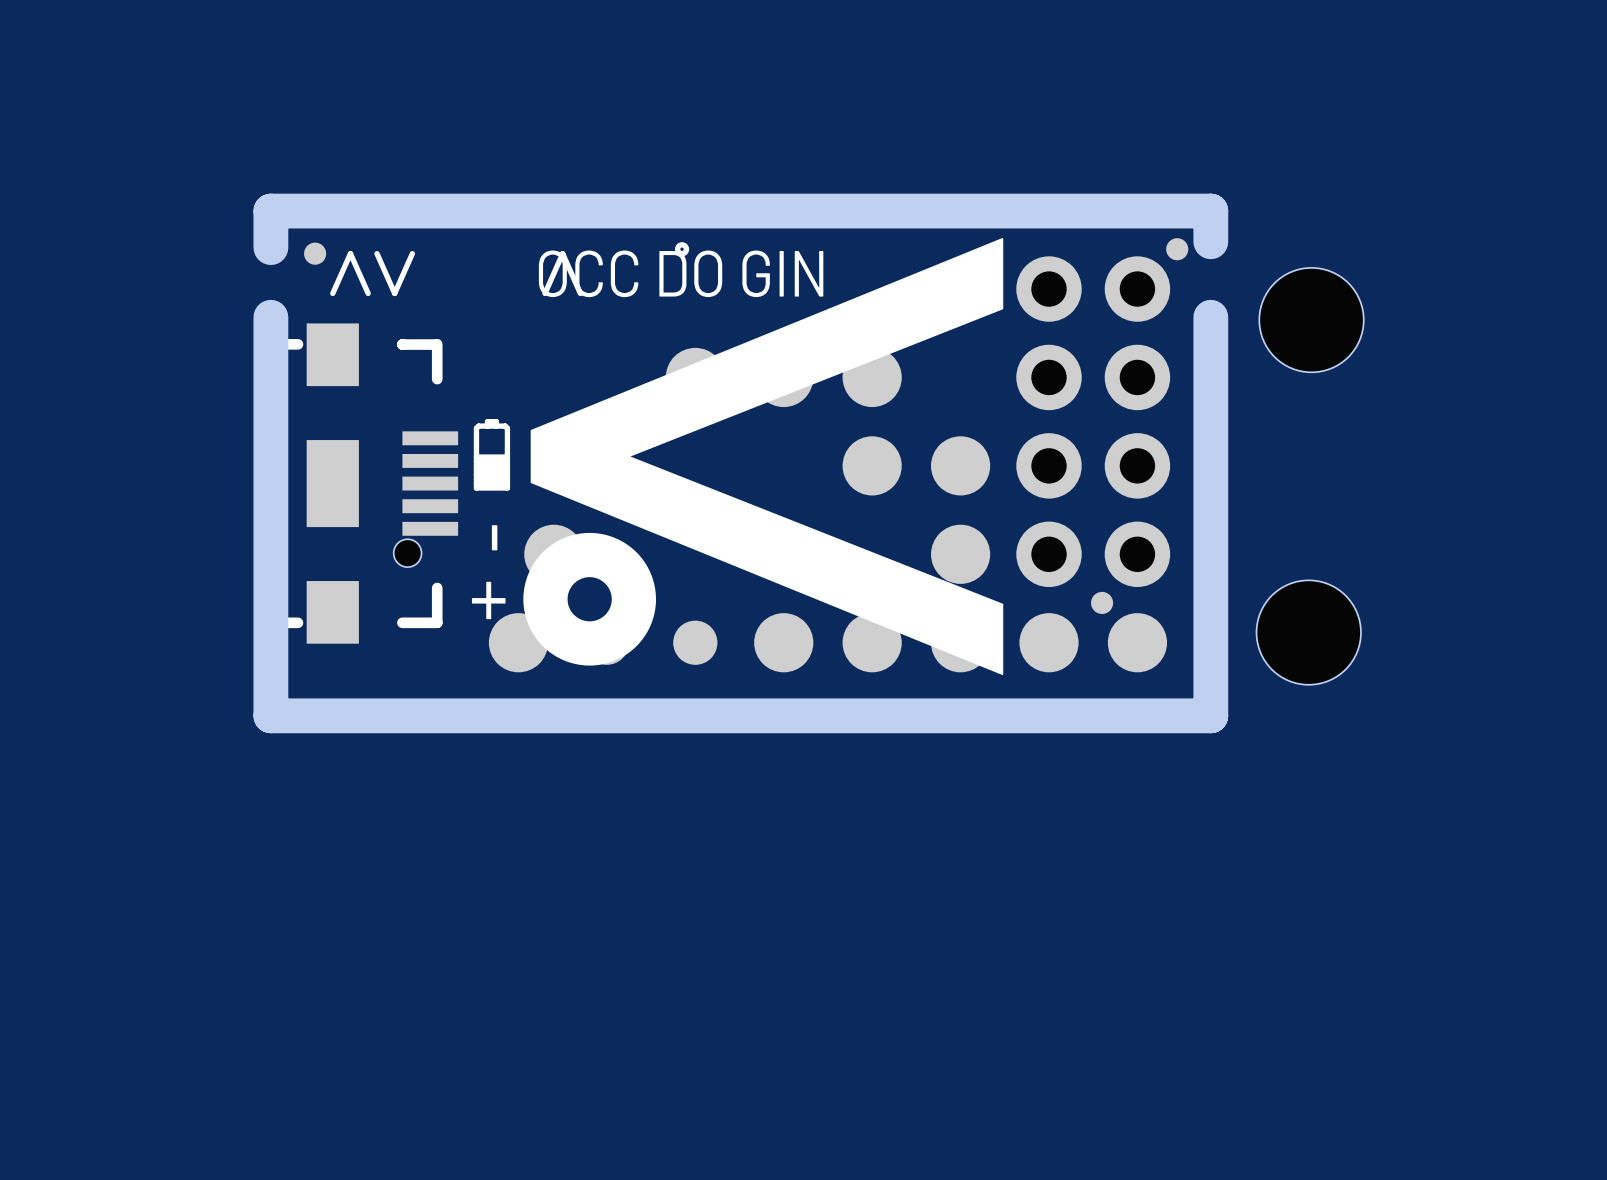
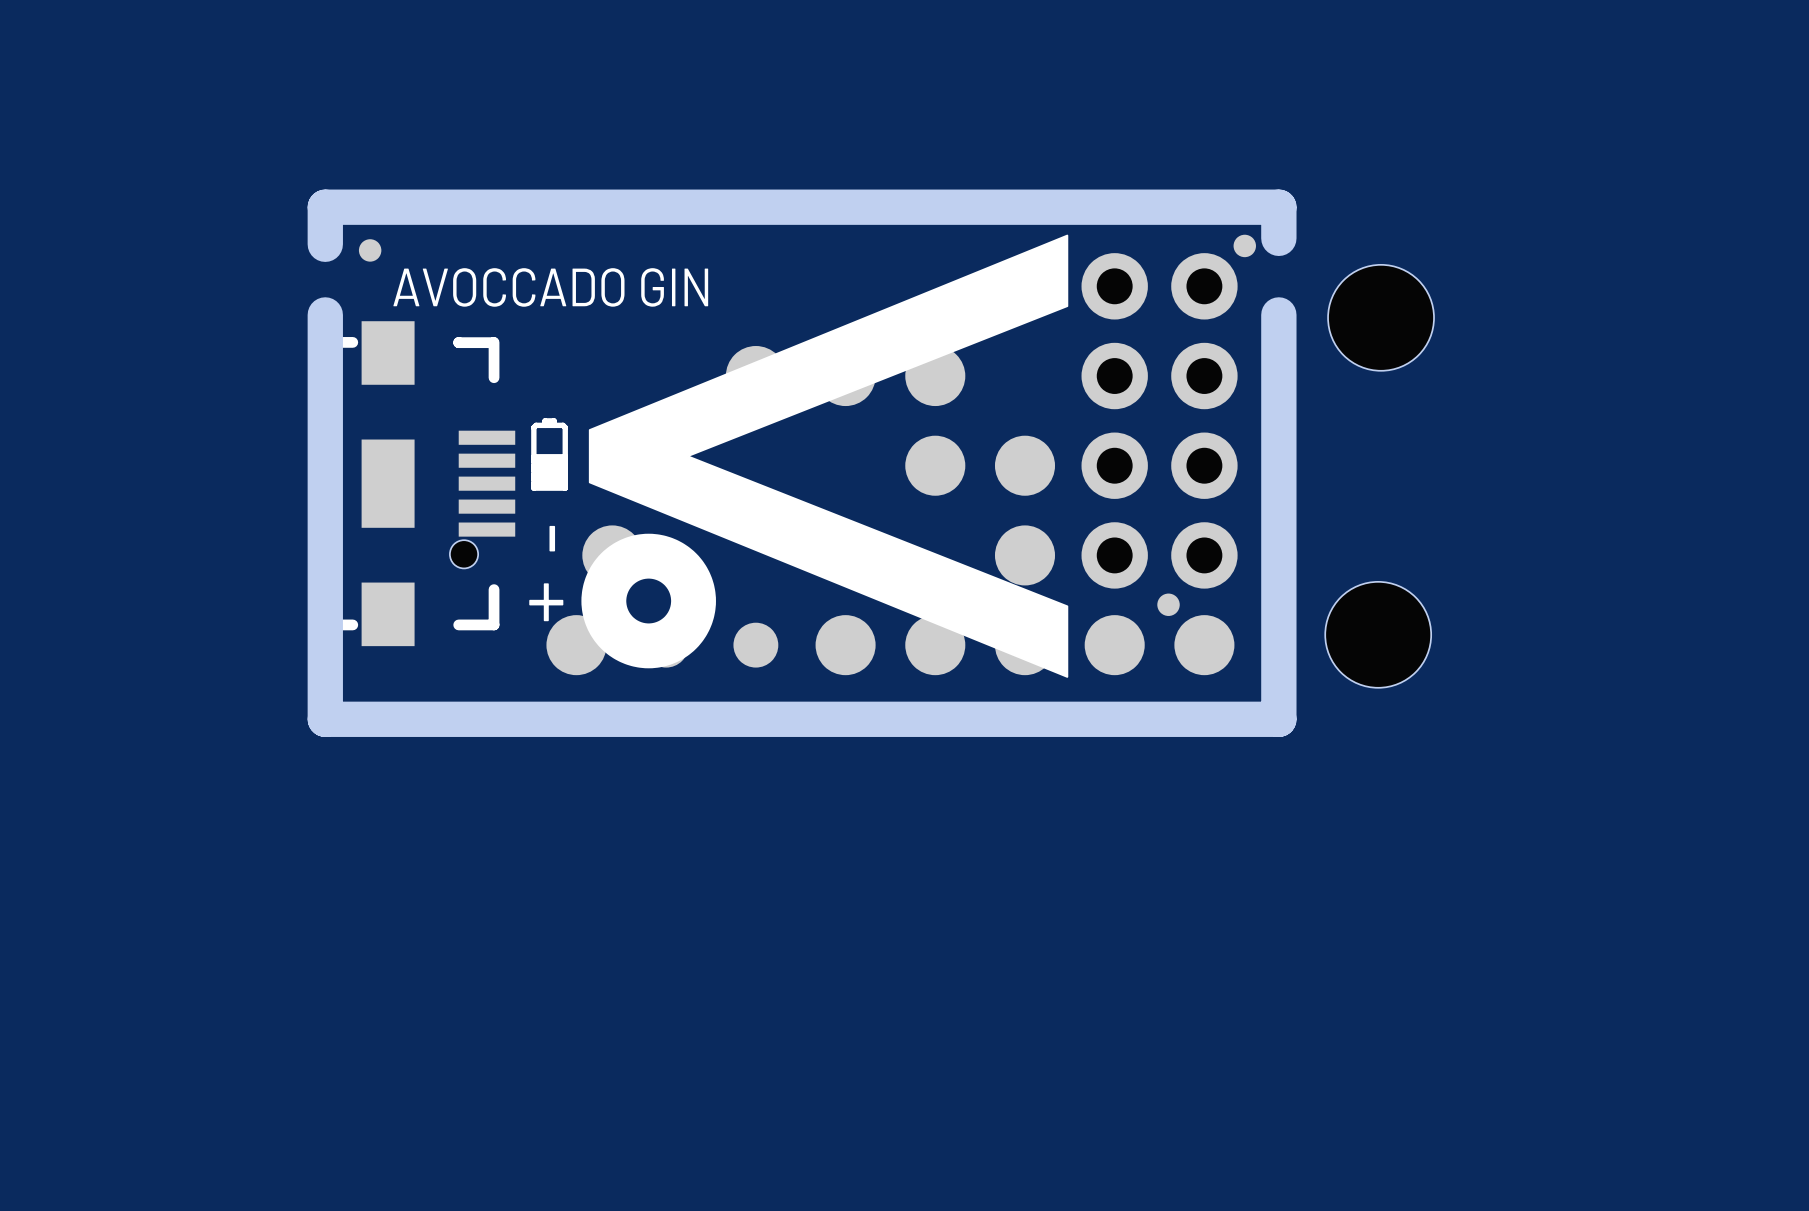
drawing: [674, 242, 690, 257] -> none
line: (412, 253) (394, 293) (377, 253) -> none
text: OCC DO GIN (681, 273) -> AVOCCADO GIN (550, 287)
line: (368, 293) (350, 253) (332, 293) -> none
line: (580, 293) (562, 253) (545, 293) -> none

